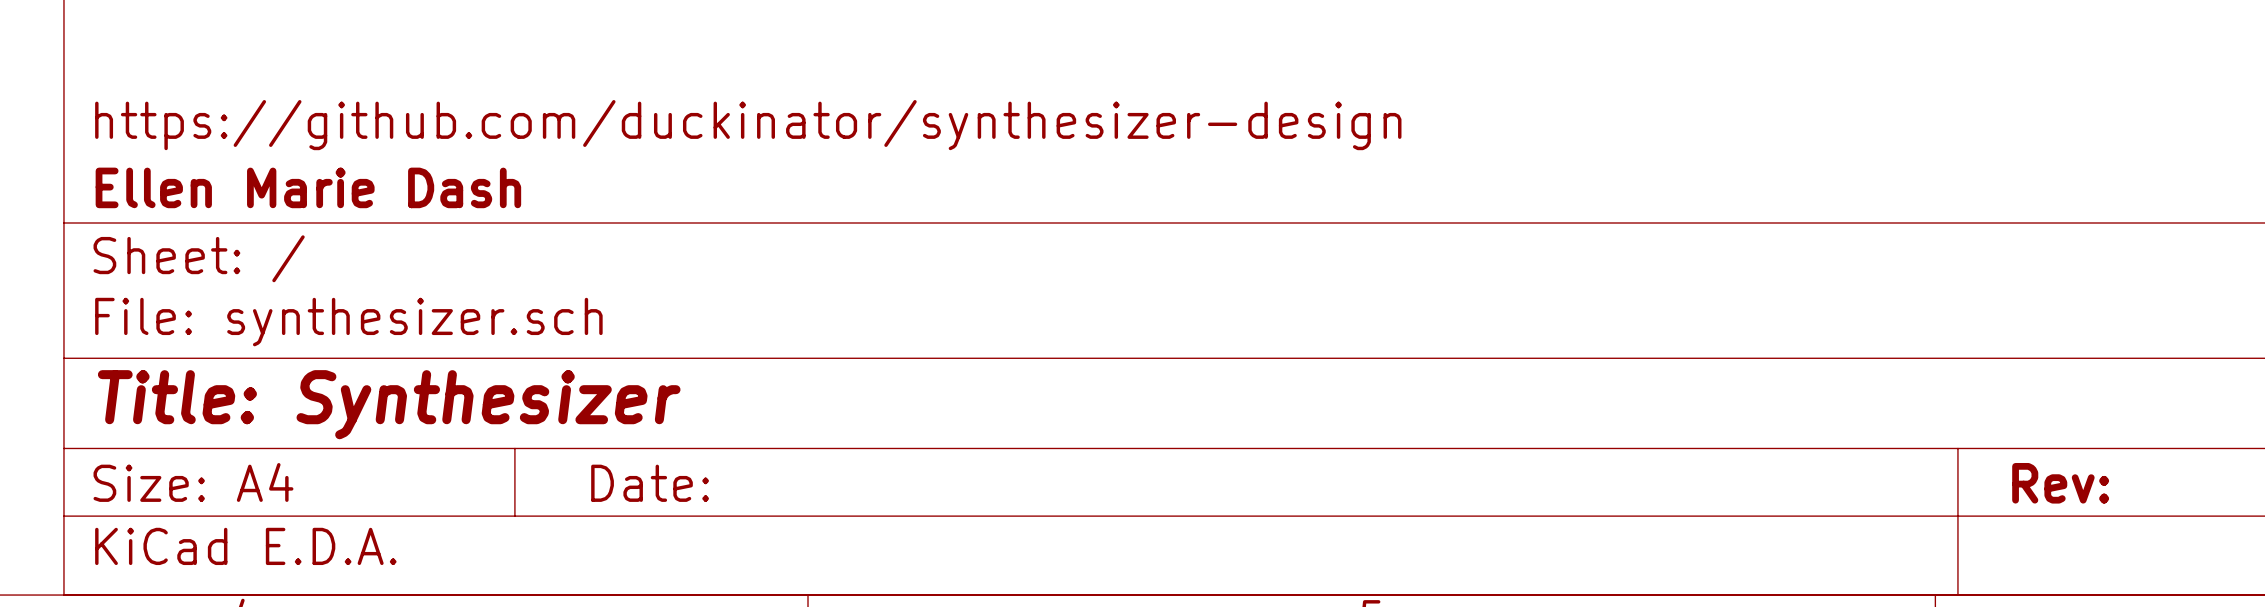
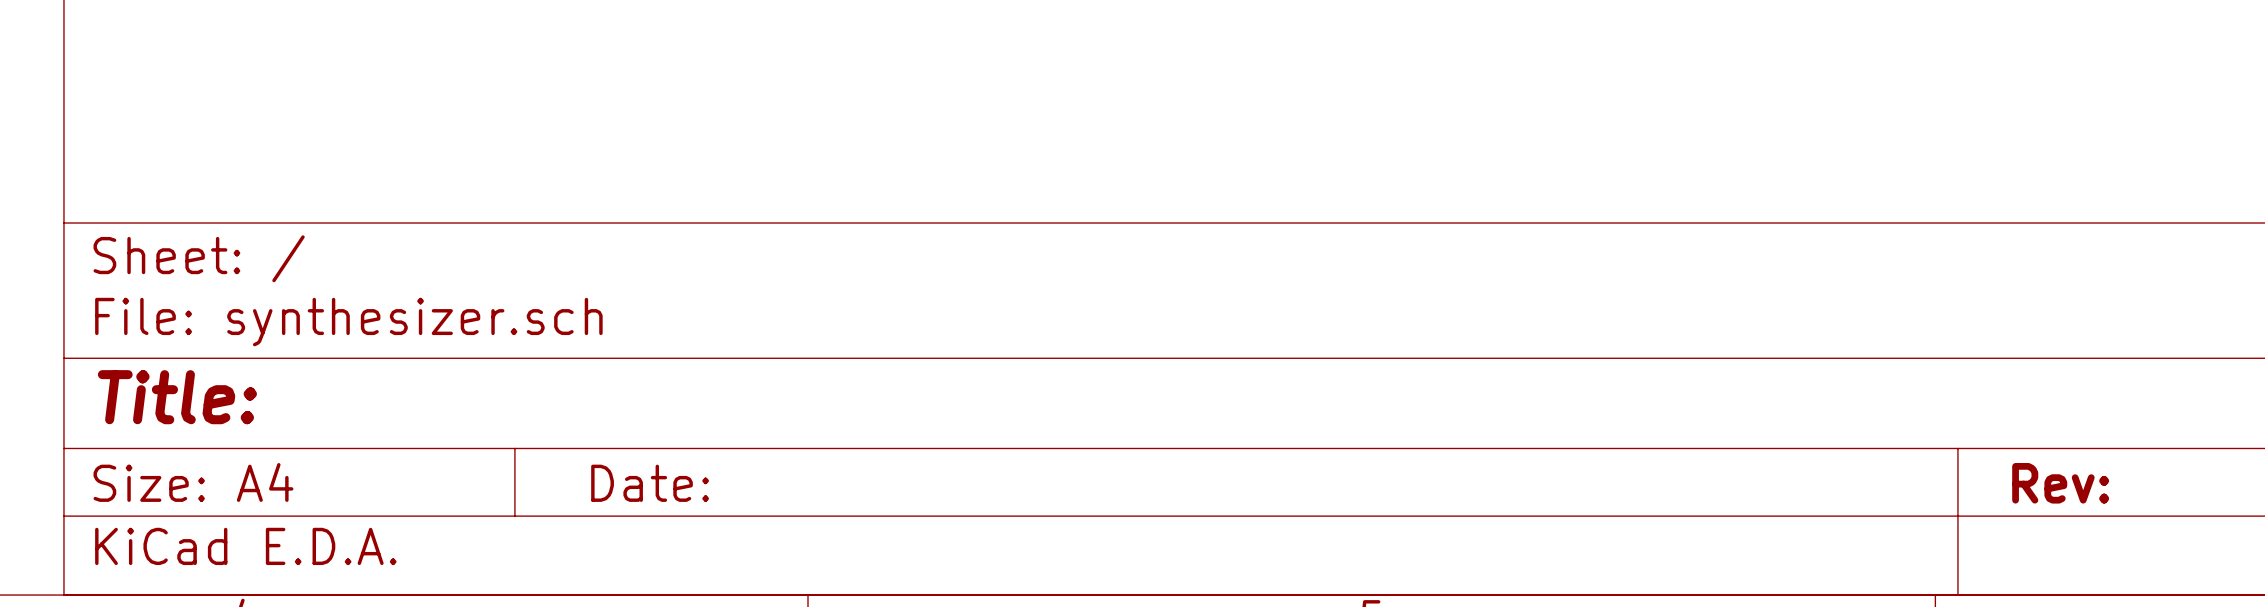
title block: https://github.com/duckinator/synthesizer-design (748, 125) -> none
title block: Ellen Marie Dash (308, 187) -> none
title block: Title: Synthesizer (389, 404) -> Title: (177, 397)

